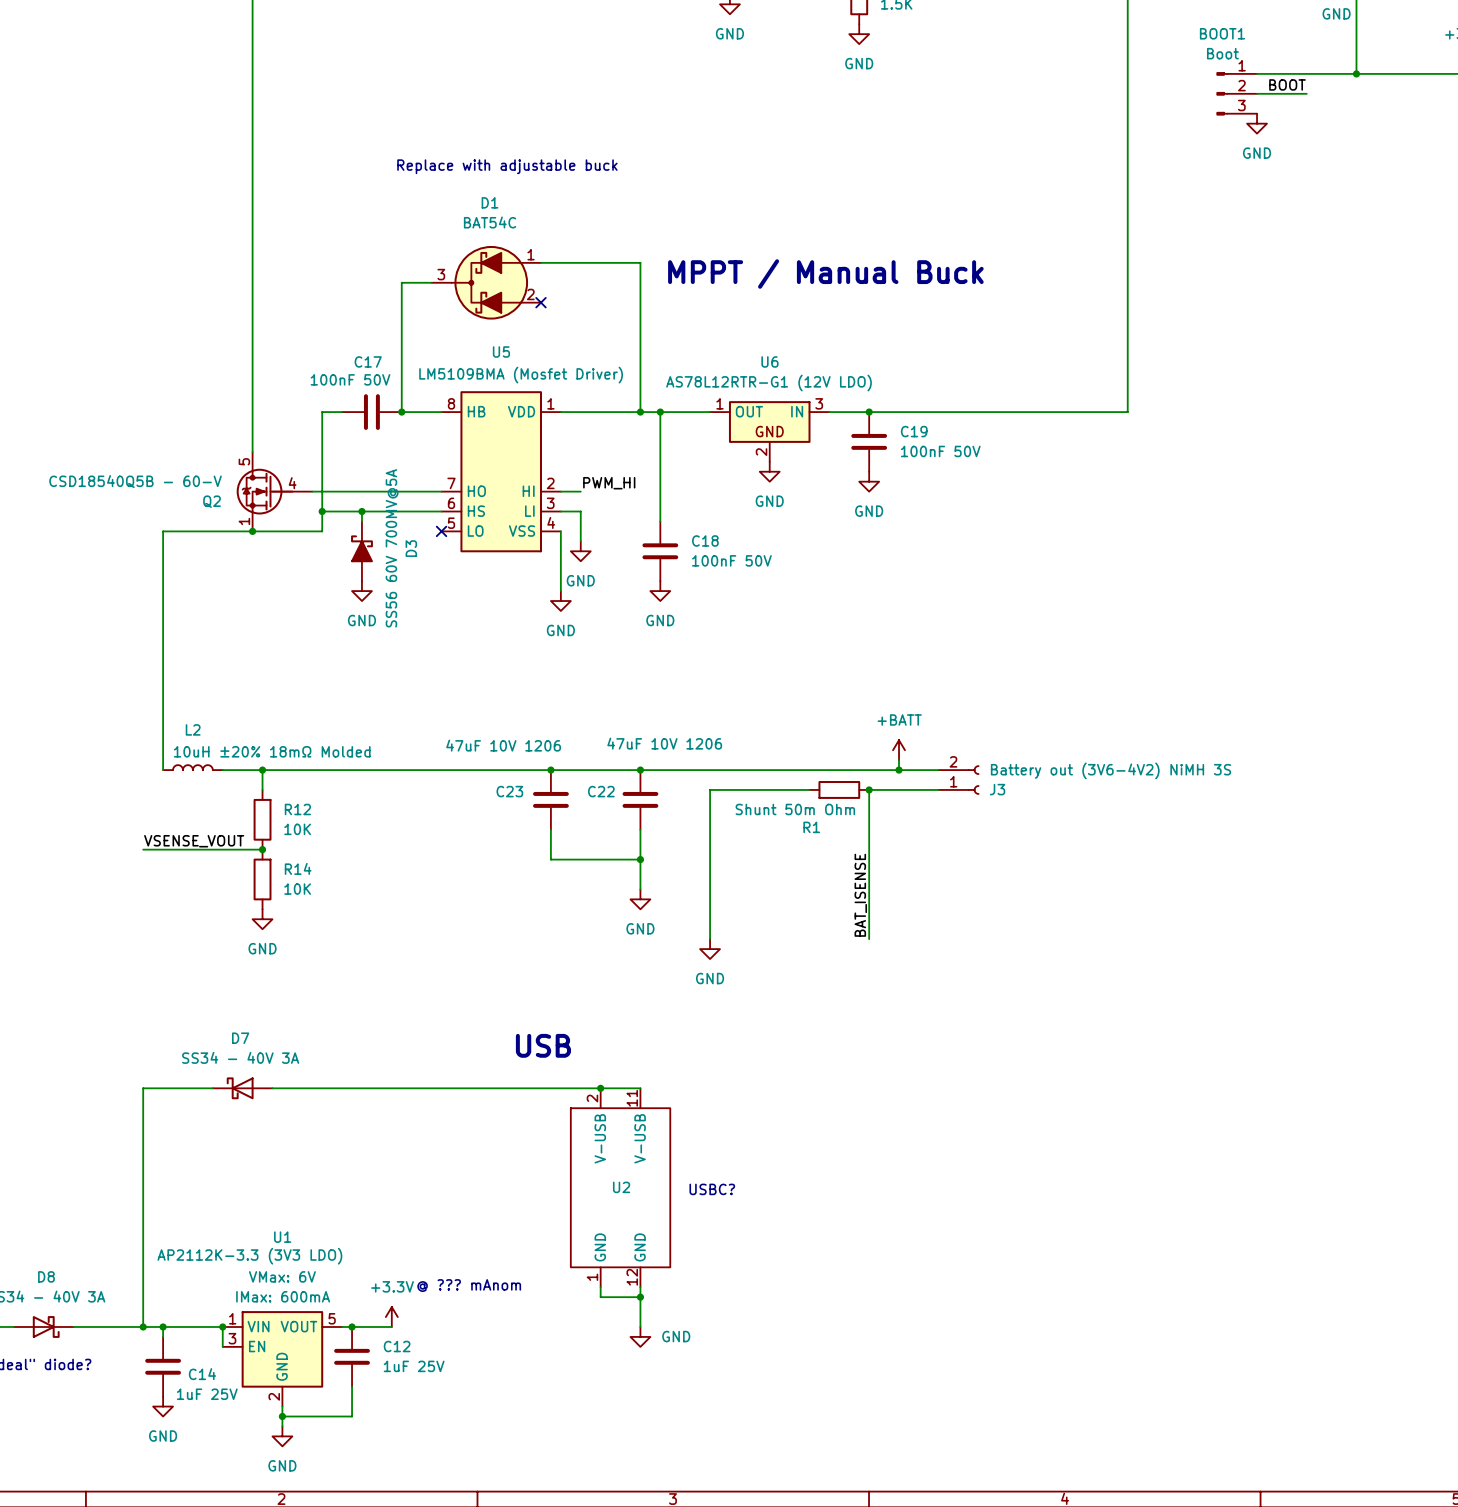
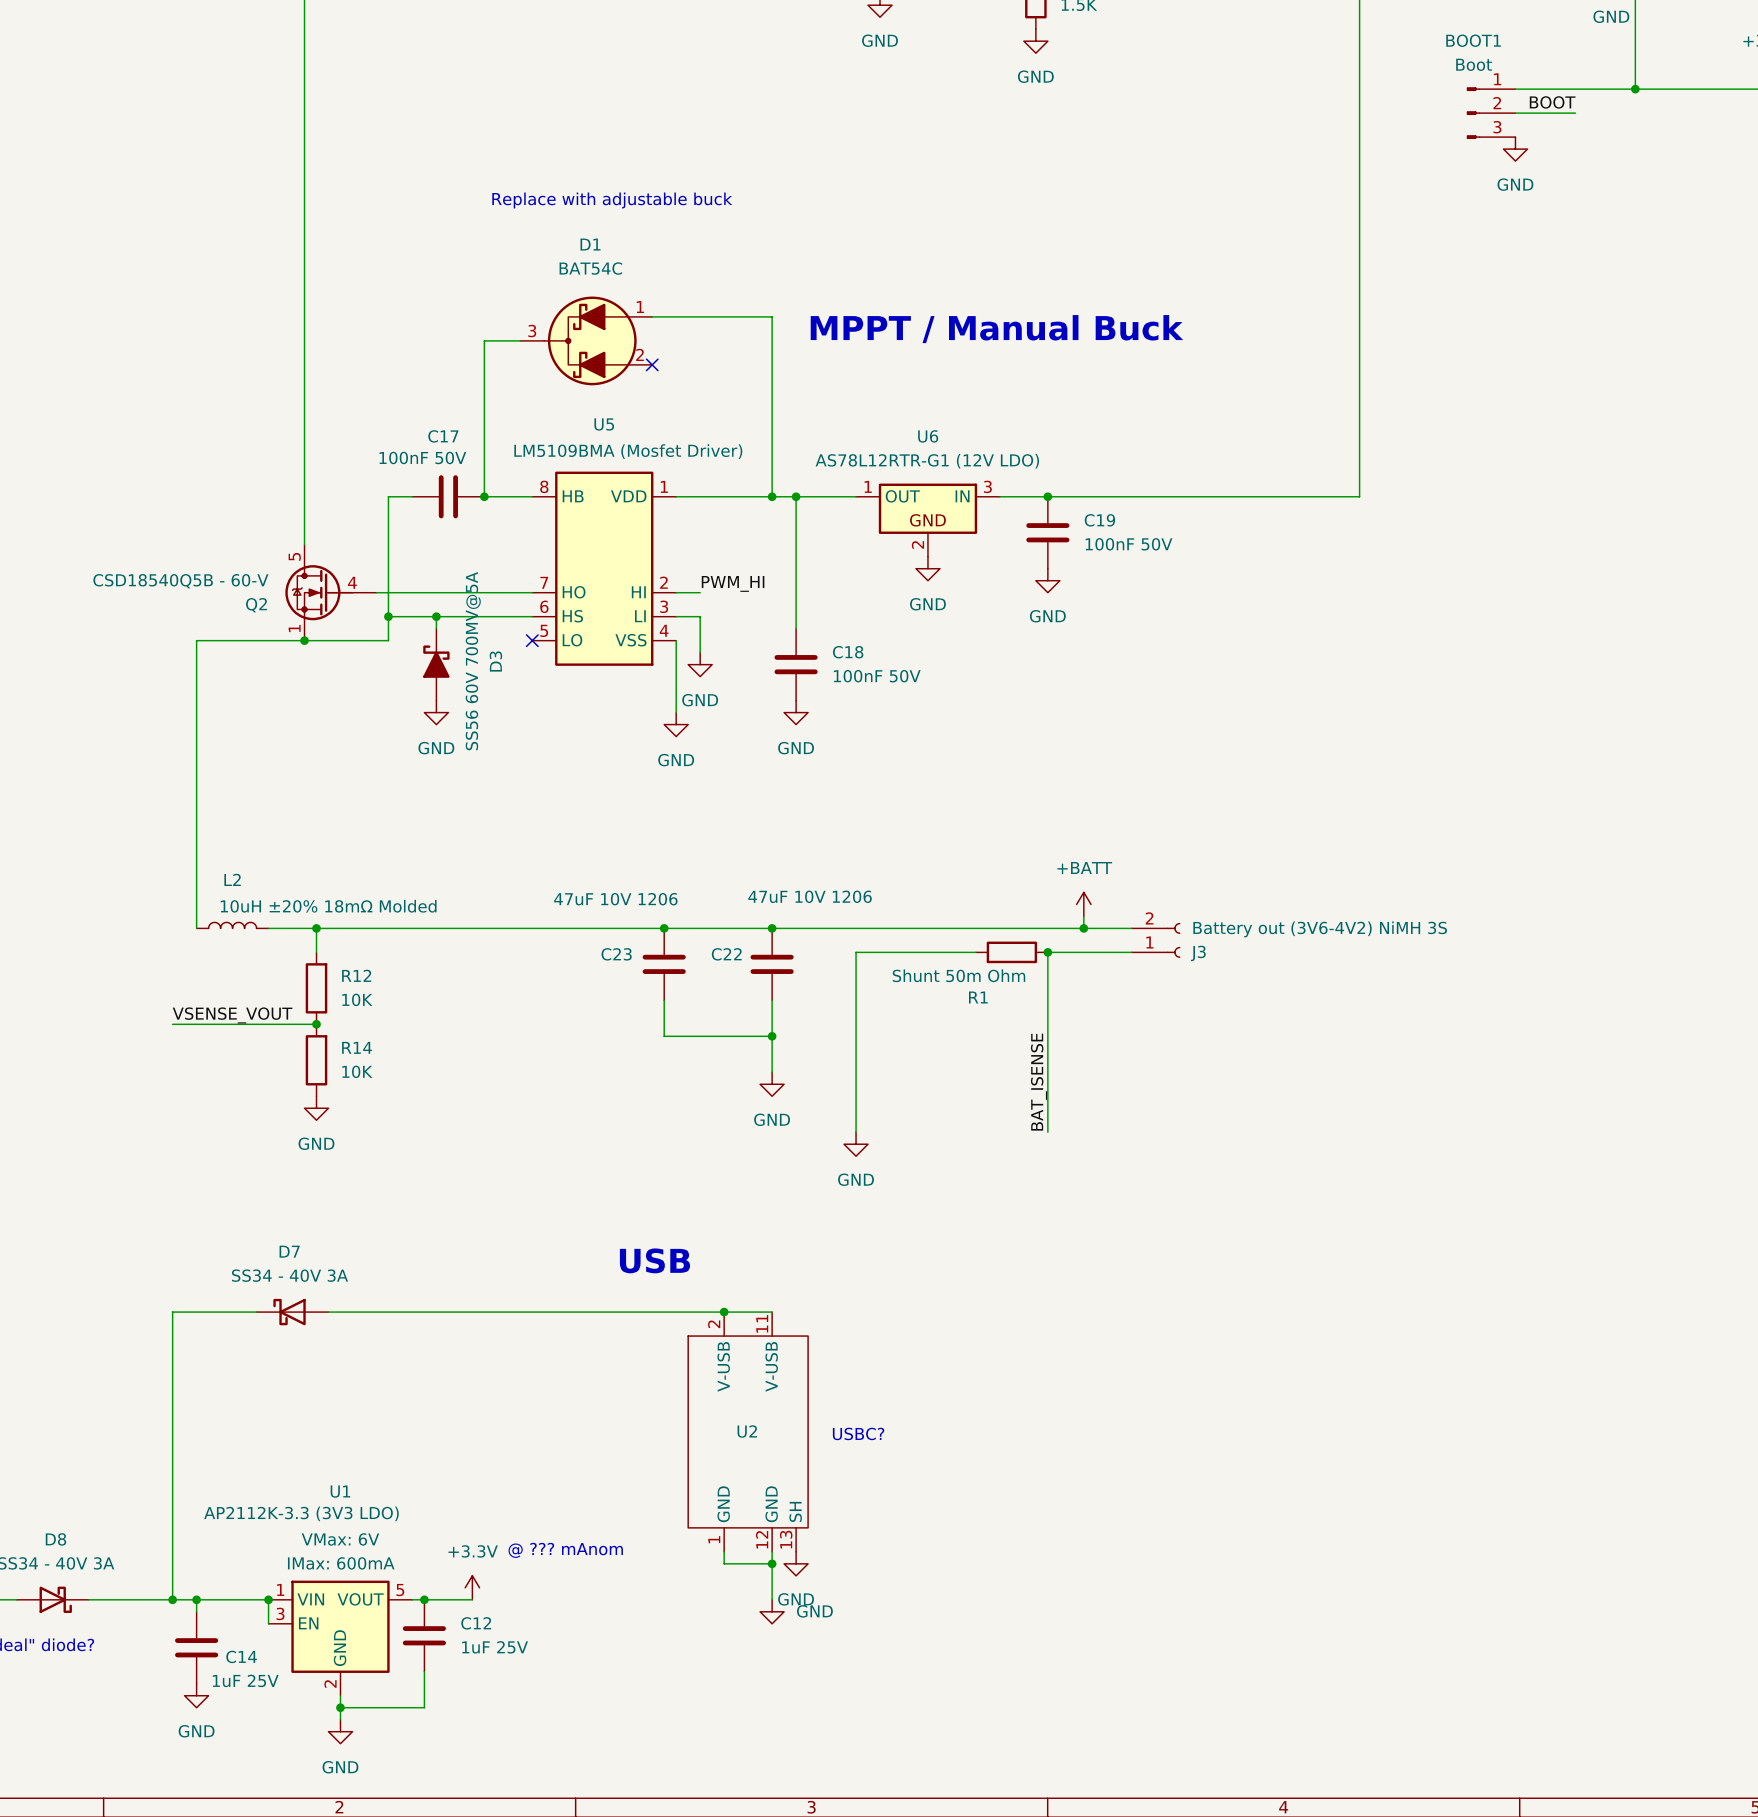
U2 symbol: [570, 1088, 671, 1288] -> [688, 1312, 809, 1552]
power symbol: none -> GND (796, 1563)

